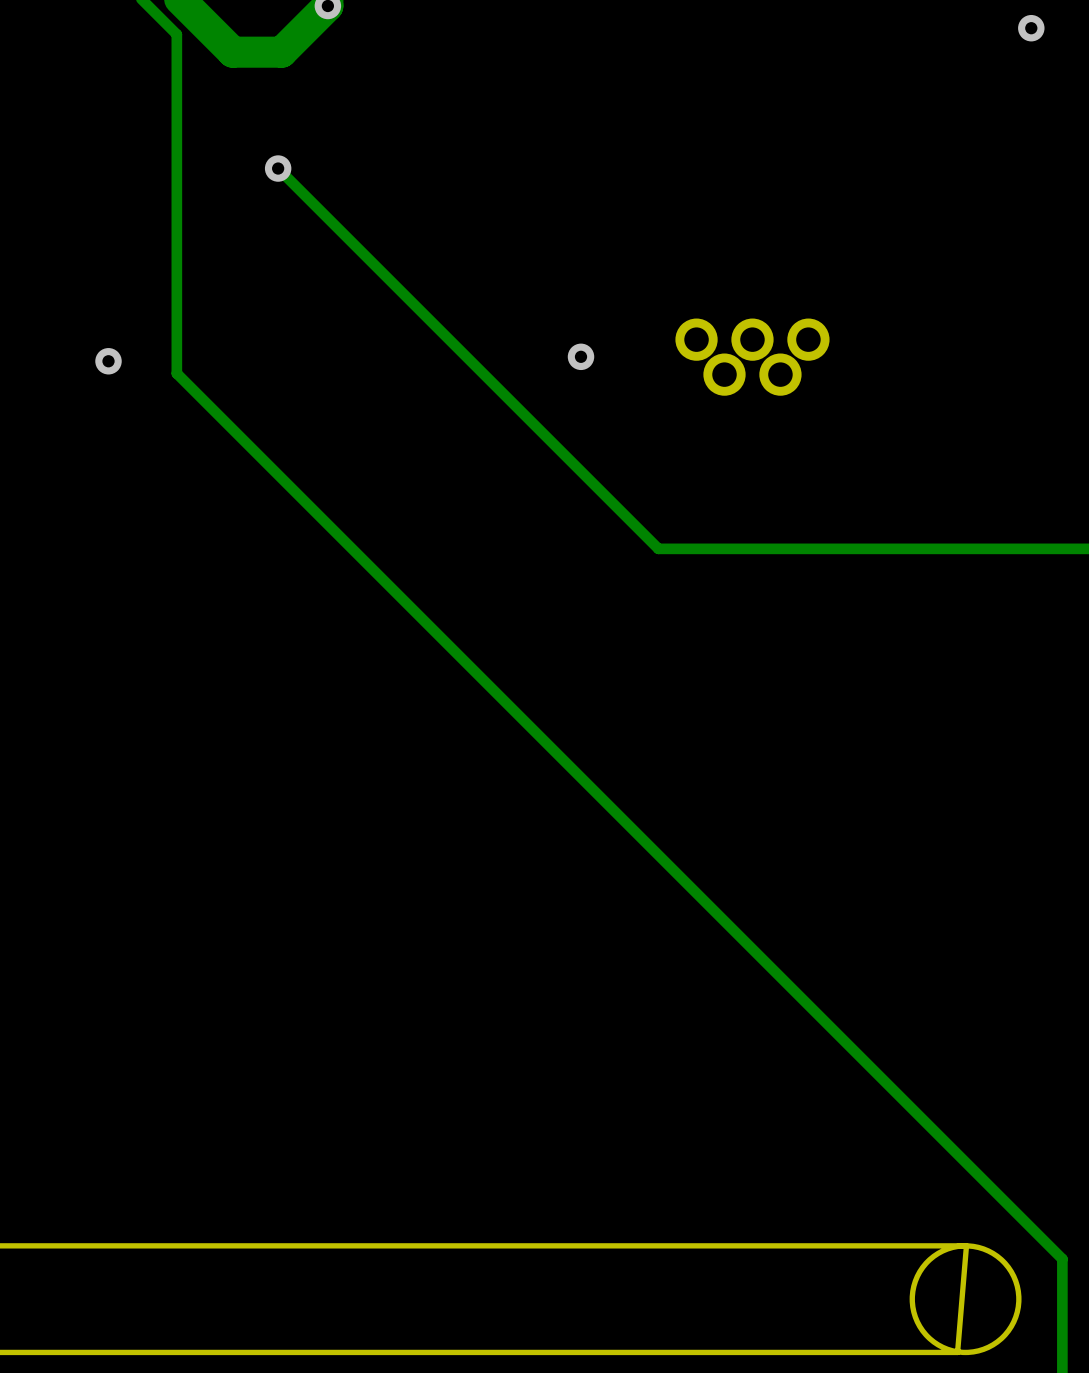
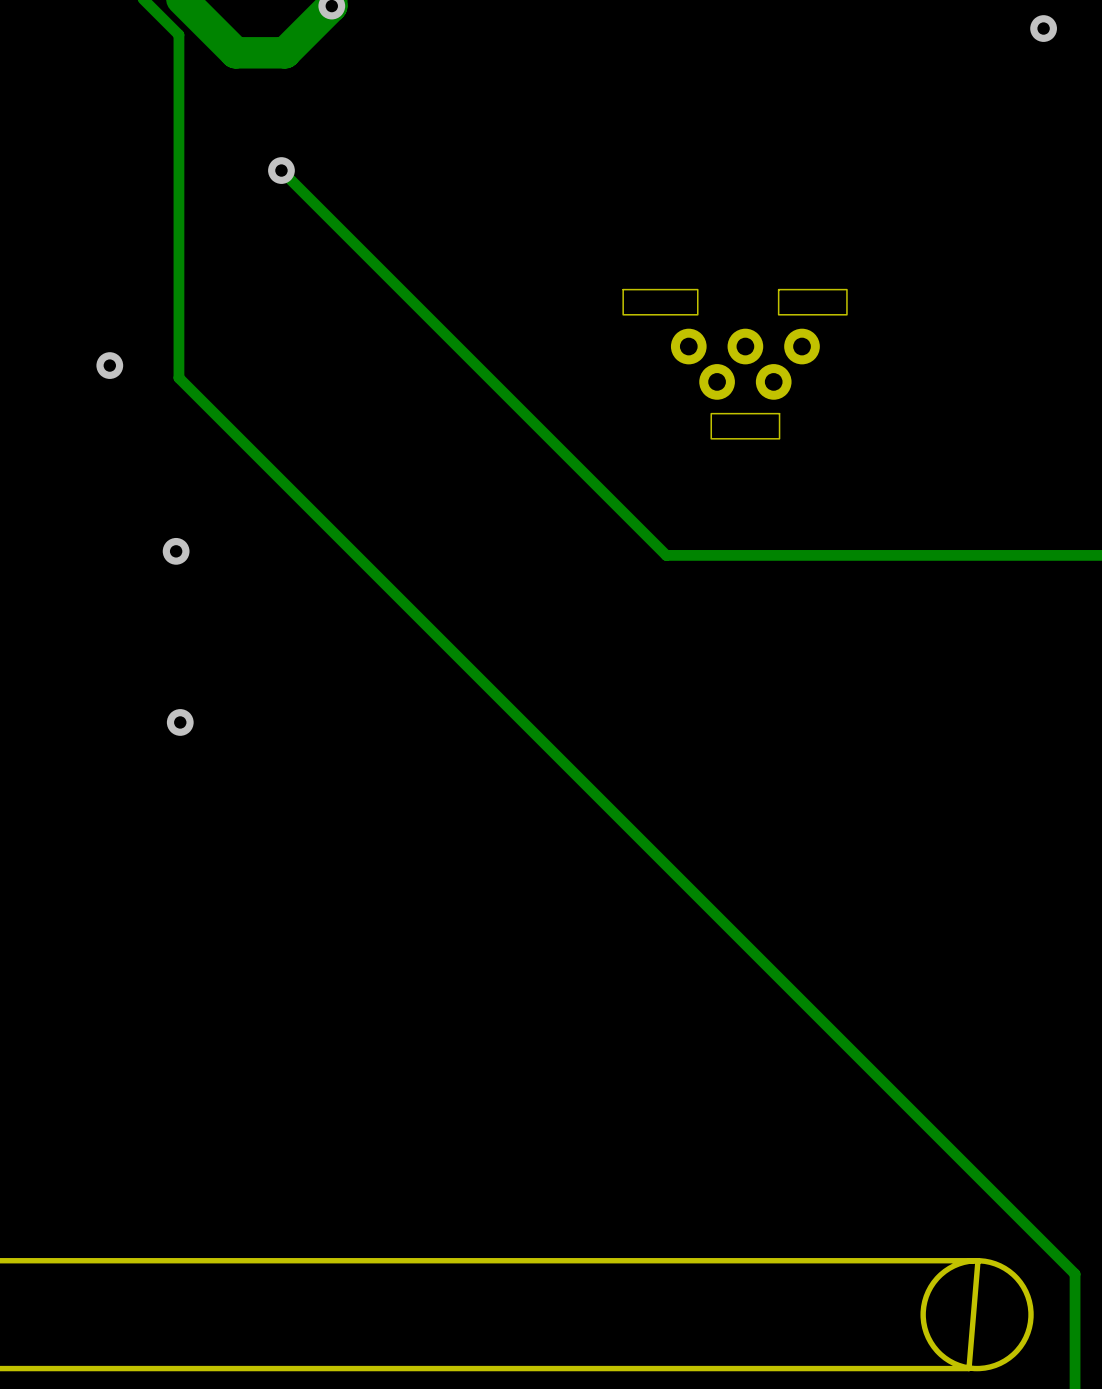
part footprint: [675, 318, 830, 396] -> [622, 289, 848, 439]
via: (581, 356) -> none
via: none -> (176, 551)
via: none -> (180, 722)

